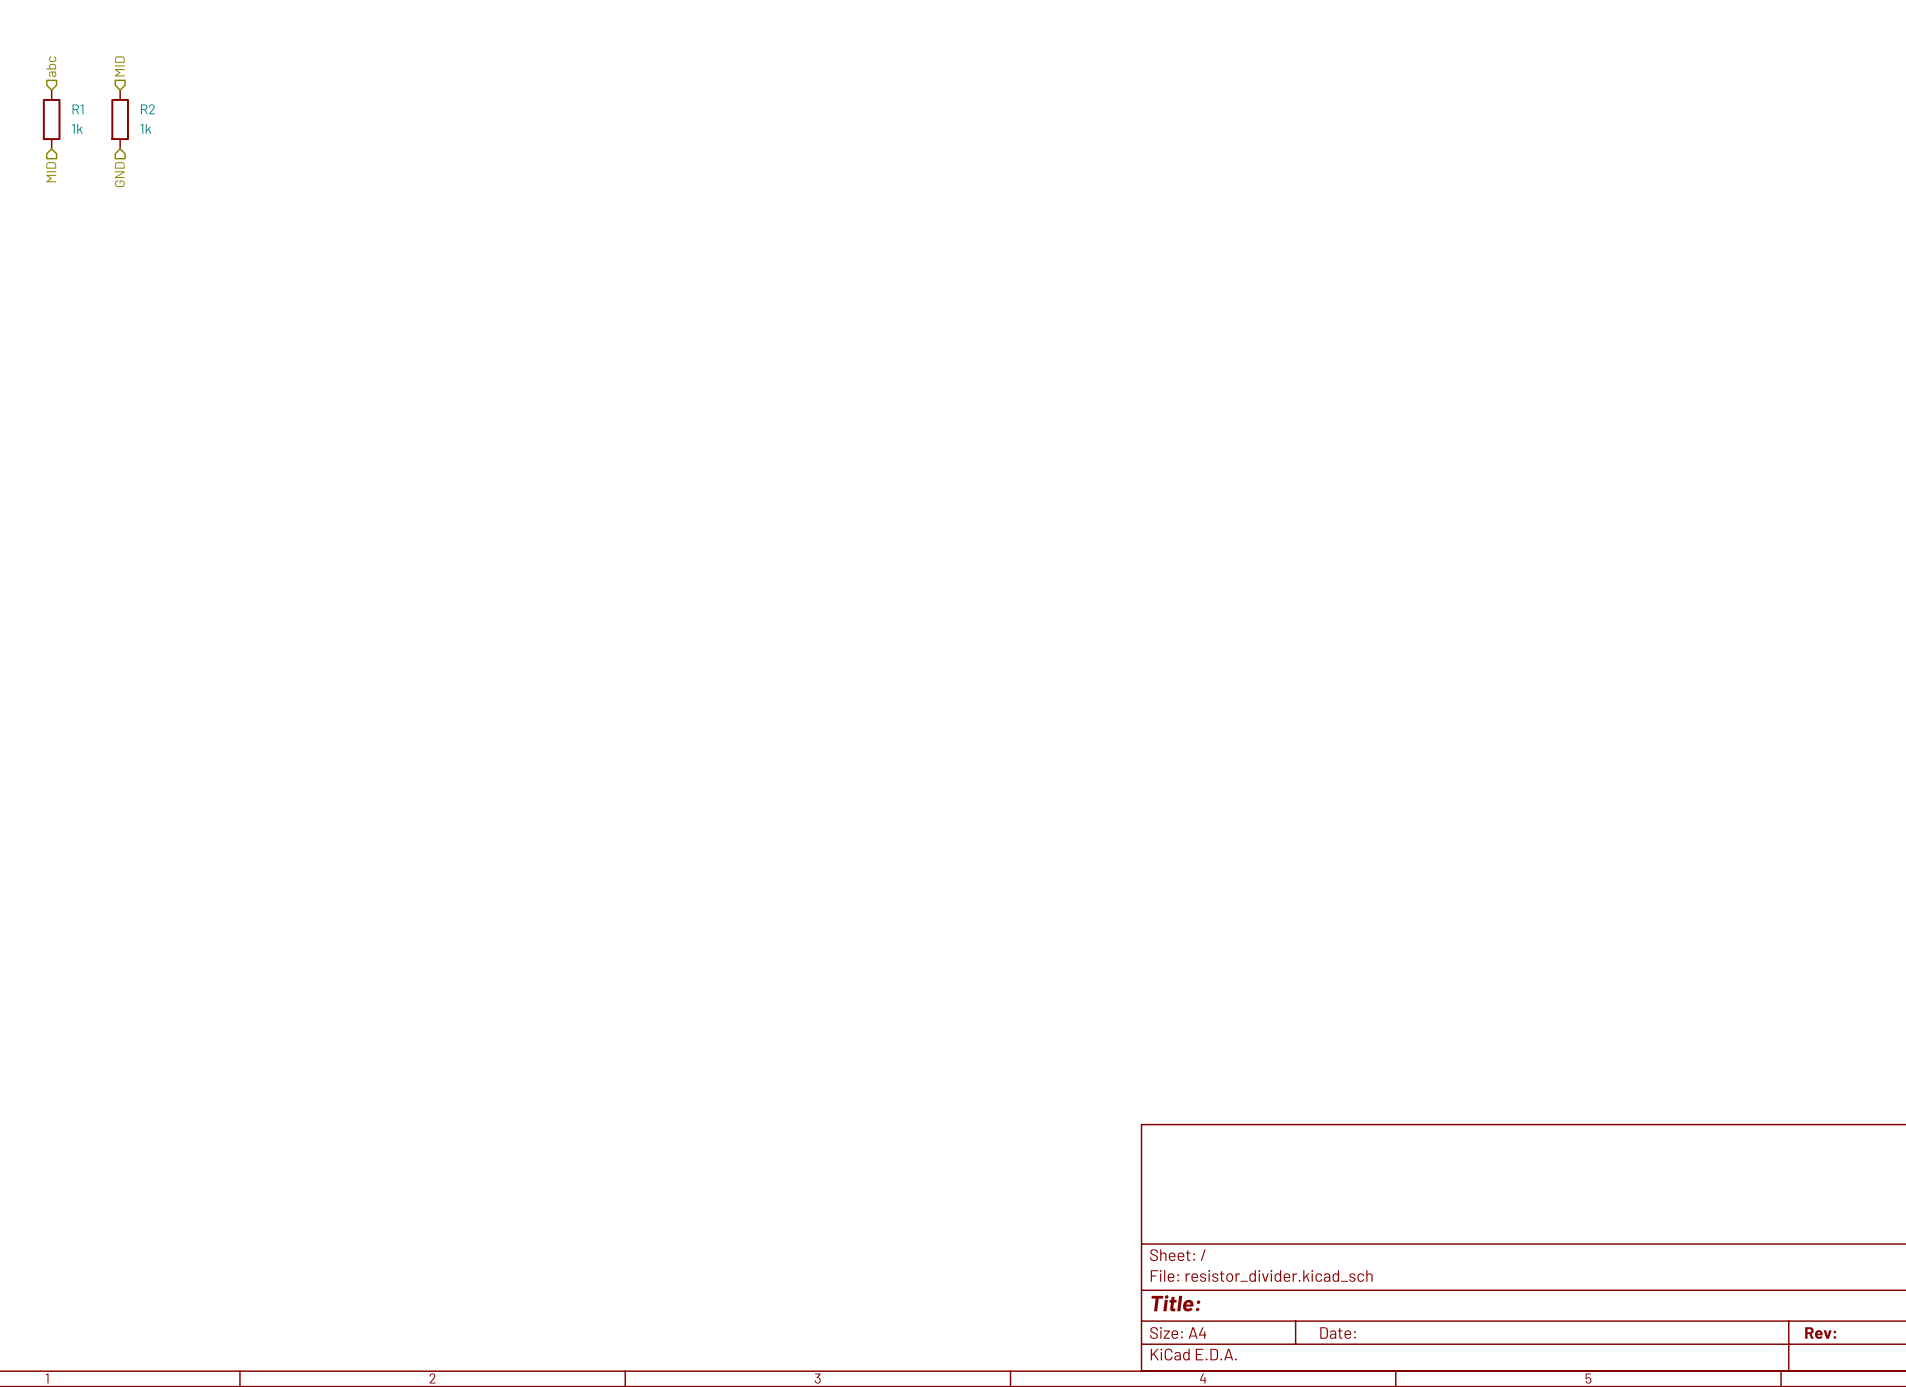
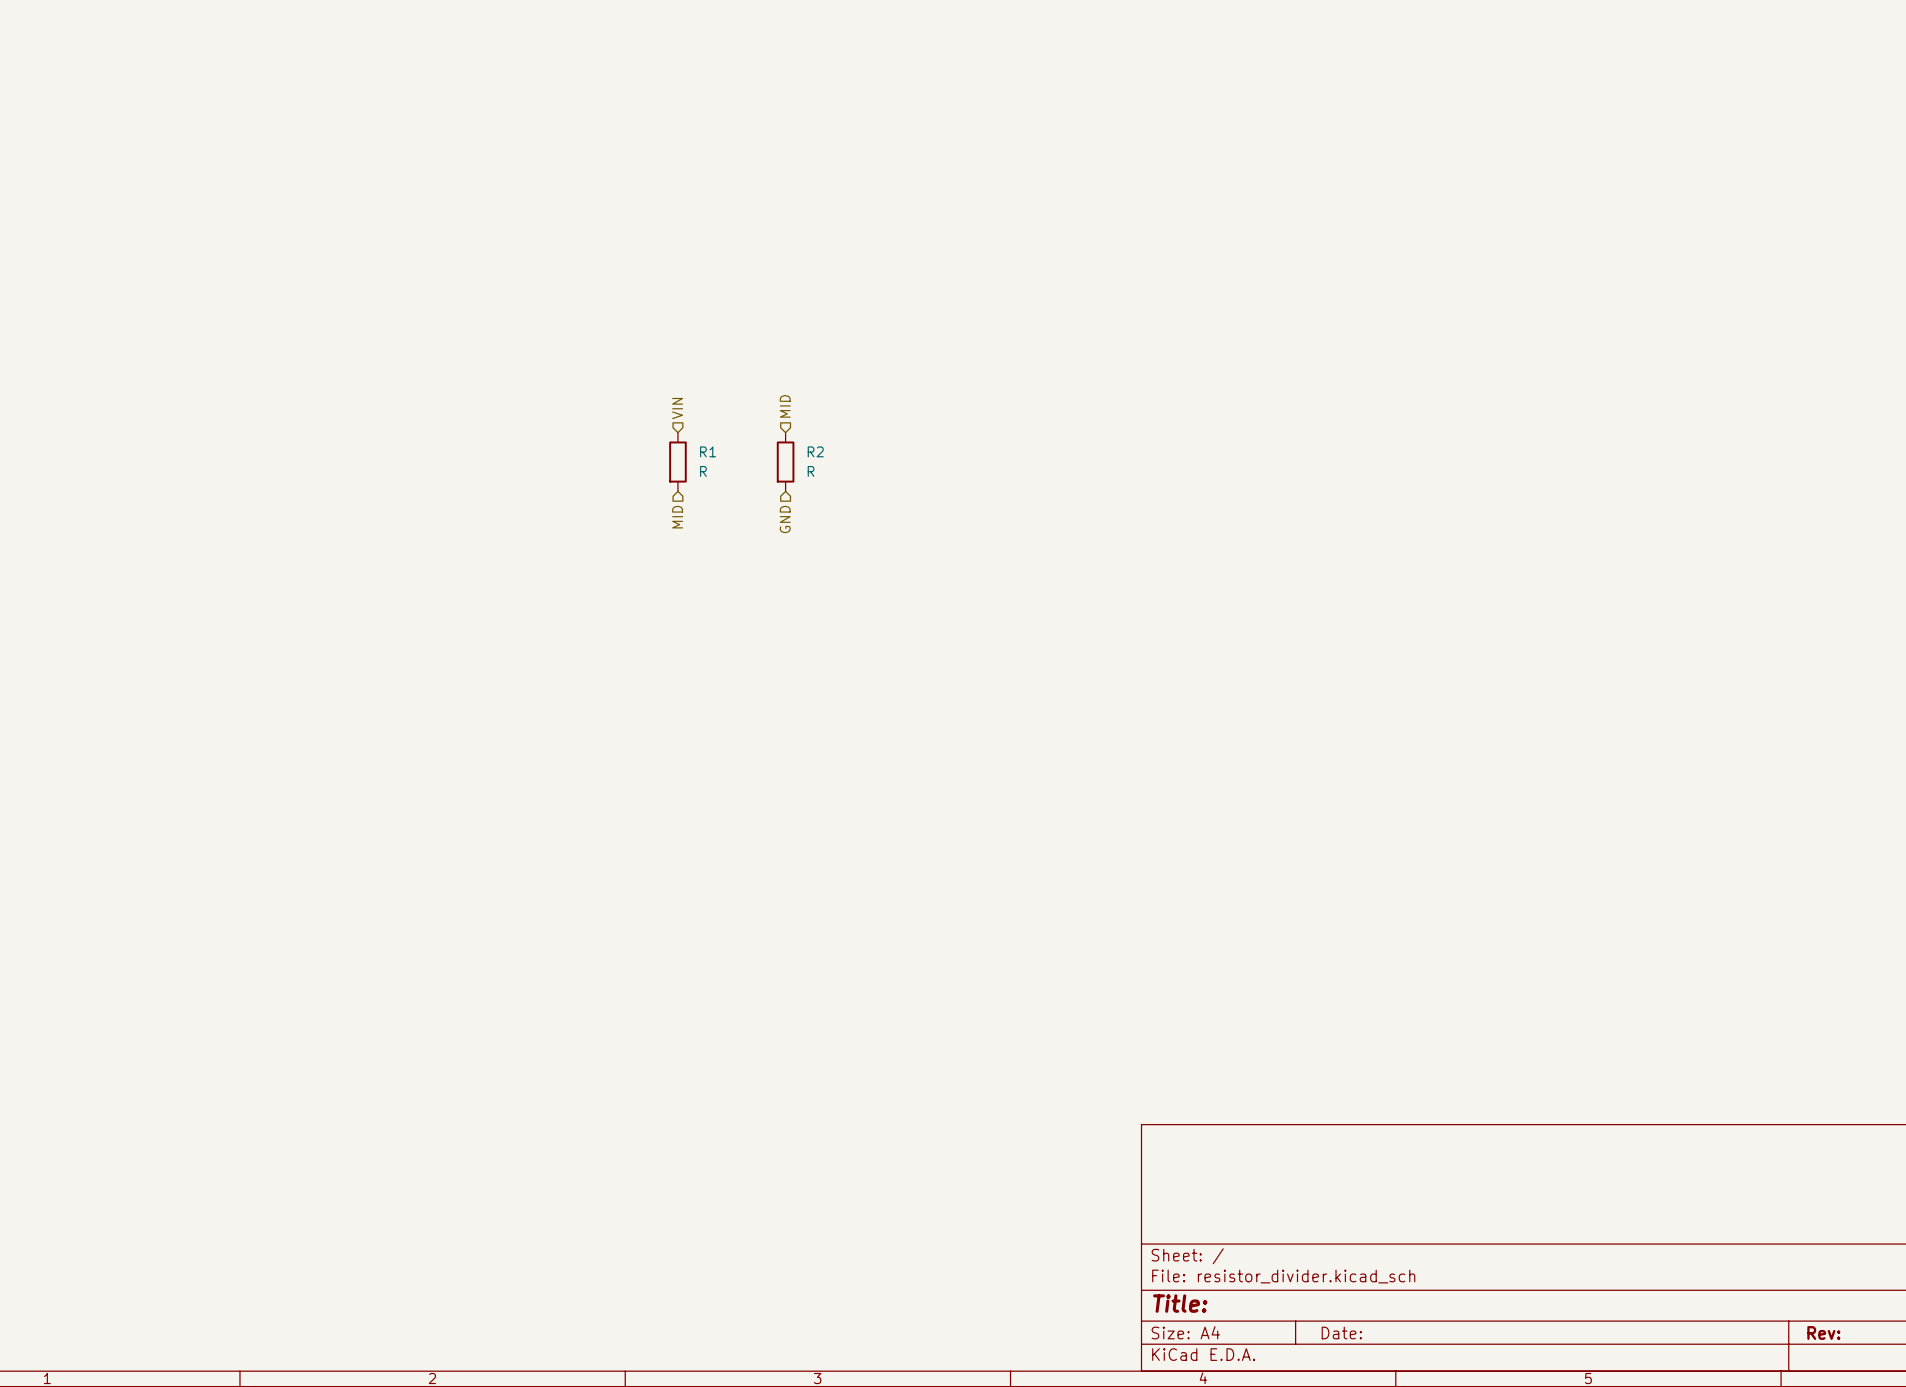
hierarchical label: abc (51, 66) -> none
hierarchical label: MID (119, 66) -> none
R1 position: (51, 119) -> (677, 462)
R2 position: (120, 119) -> (785, 462)
R1 value: 1k (77, 128) -> R (703, 471)
R2 value: 1k (145, 128) -> R (811, 471)
hierarchical label: MID (51, 172) -> none
hierarchical label: GND (119, 174) -> none
hierarchical label: none -> MID (785, 406)
hierarchical label: none -> VIN (677, 408)
hierarchical label: none -> MID (677, 517)
hierarchical label: none -> GND (785, 519)

